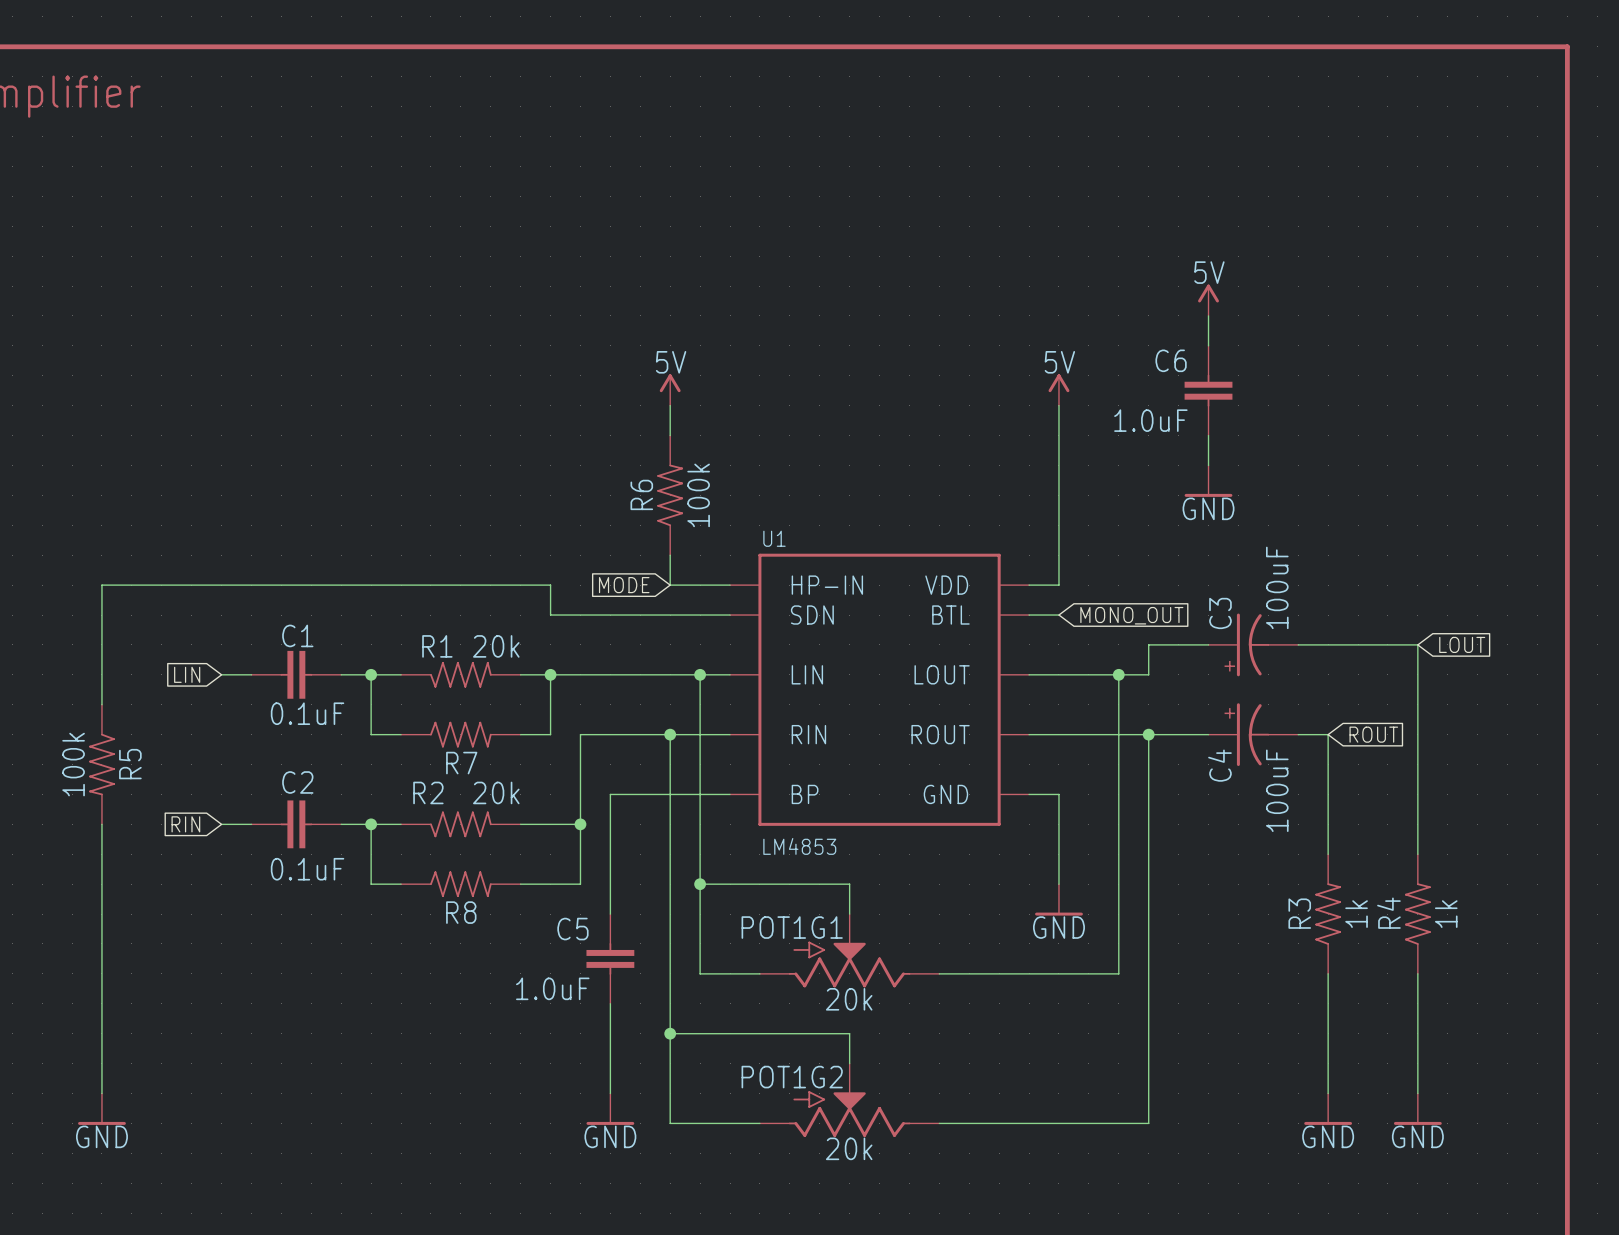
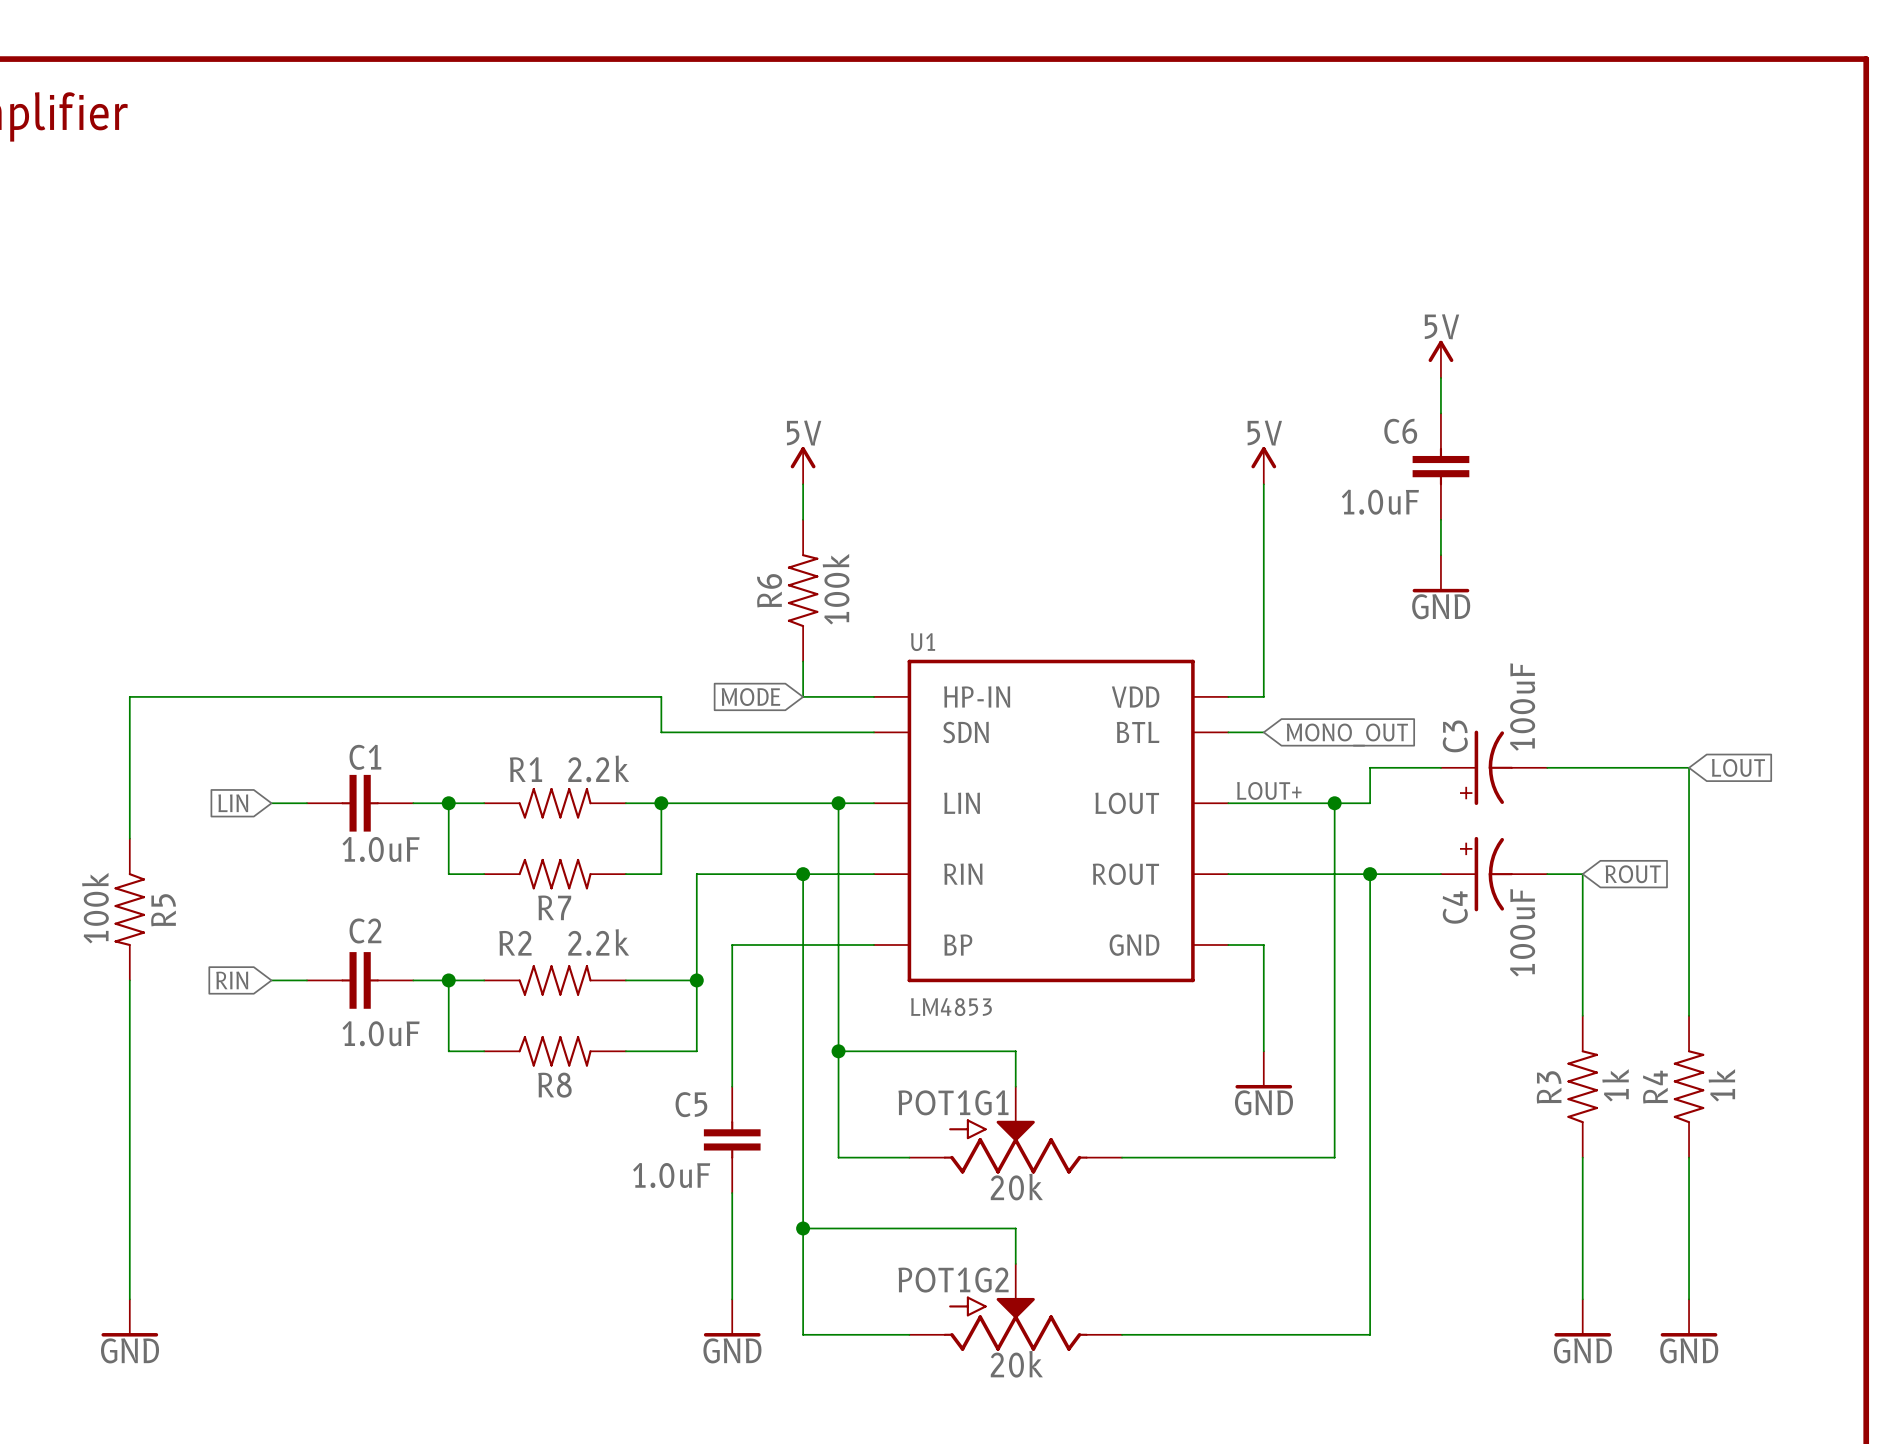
R1 value: 20k (496, 646) -> 2.2k (598, 768)
label: none -> LOUT+ (1269, 790)
C1 value: 0.1uF (307, 713) -> 1.0uF (381, 849)
R2 value: 20k (496, 792) -> 2.2k (598, 942)
C2 value: 0.1uF (307, 869) -> 1.0uF (381, 1033)

